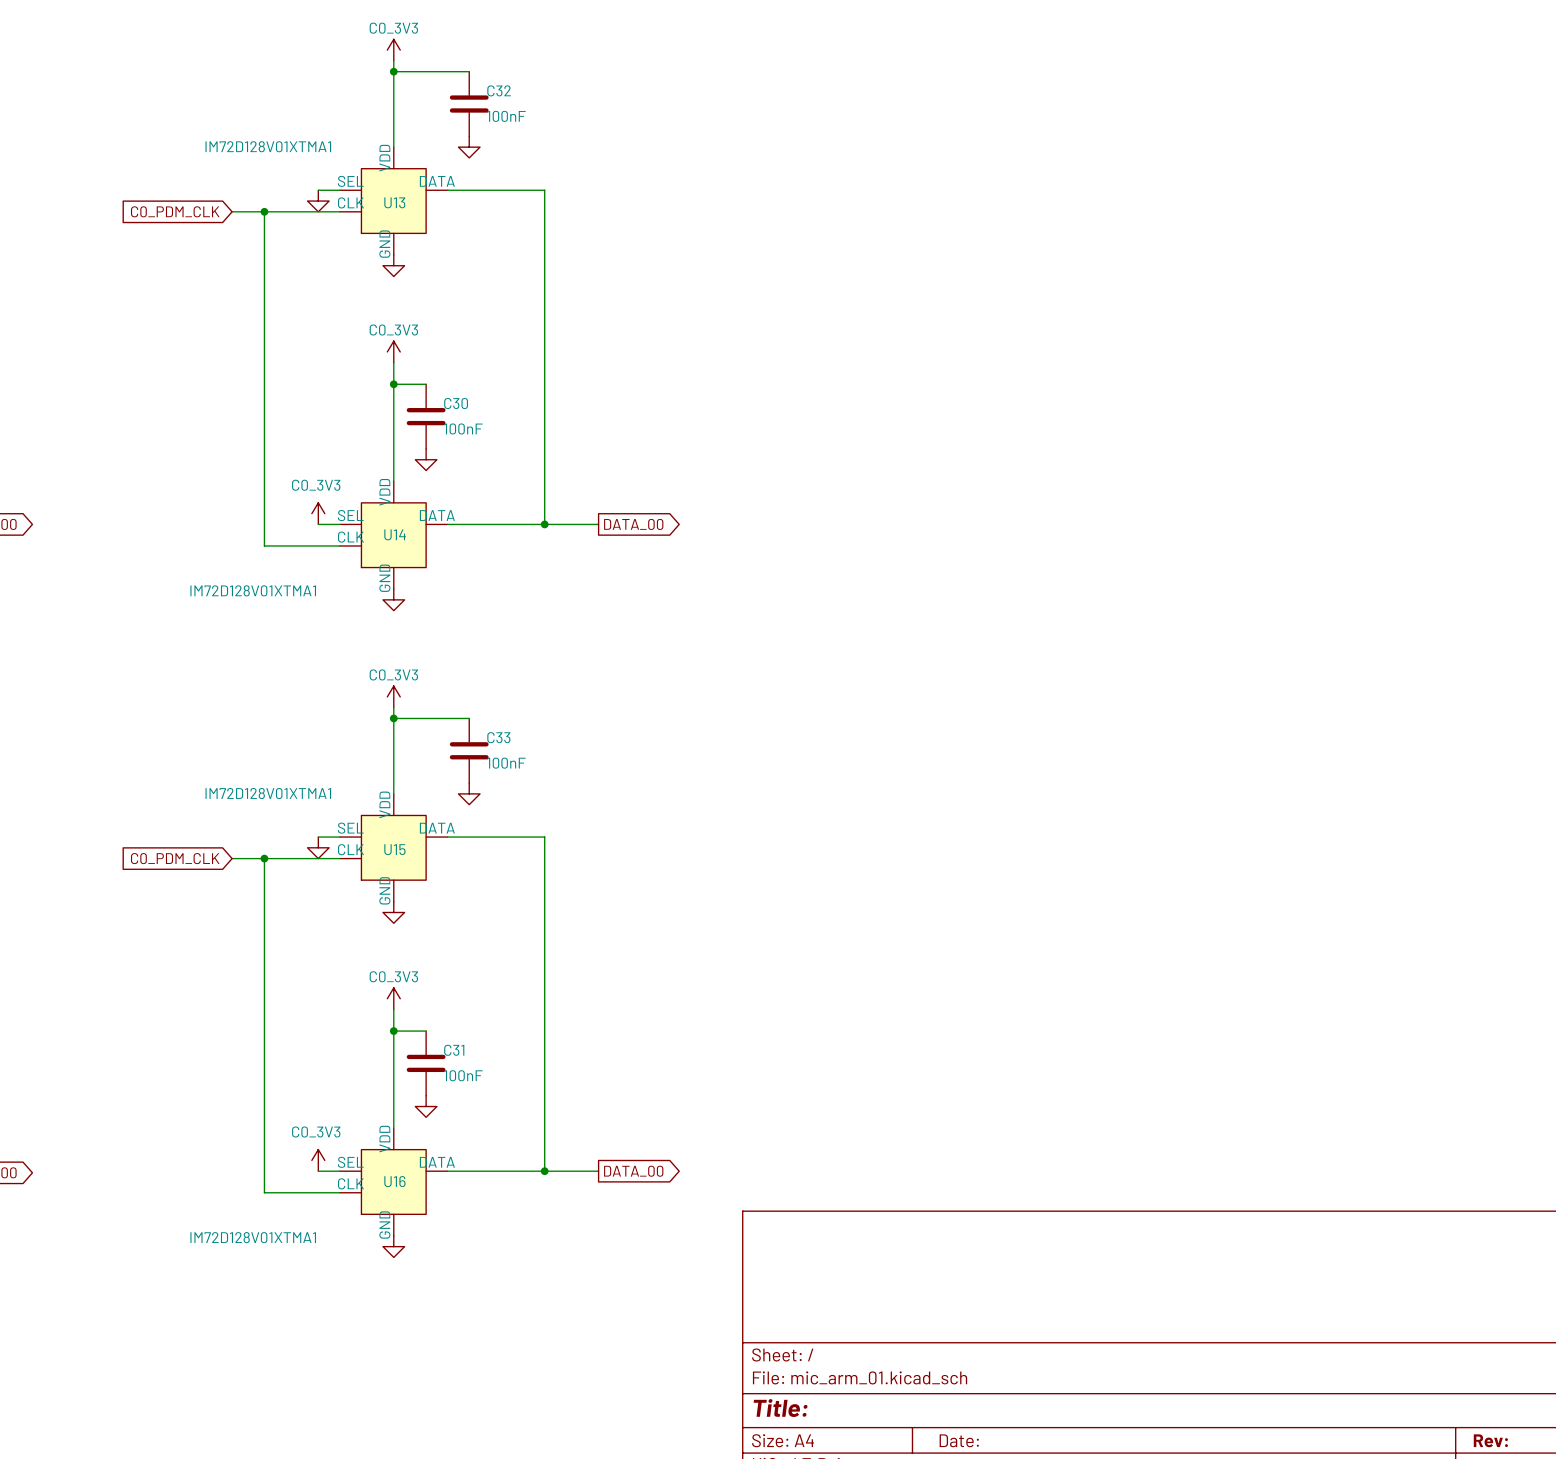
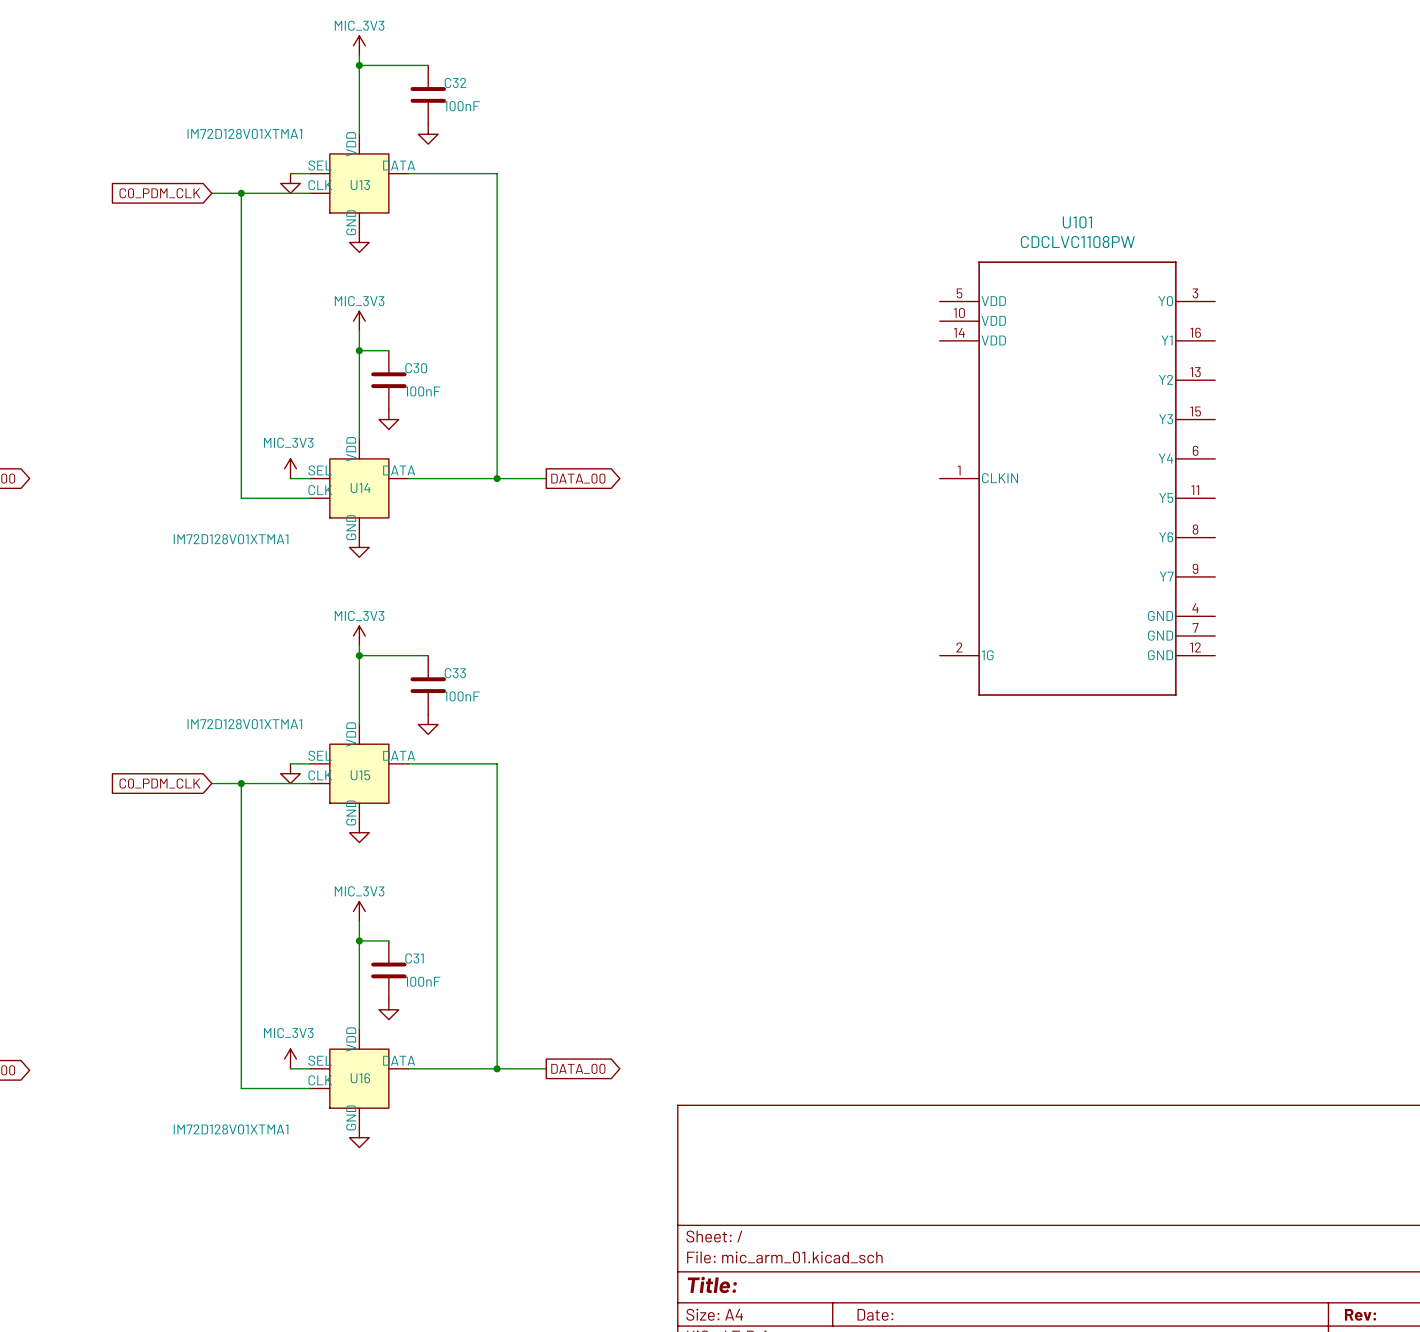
power symbol: C0_3V3 (393, 50) -> MIC_3V3 (359, 45)
power symbol: C0_3V3 (393, 351) -> MIC_3V3 (359, 321)
power symbol: C0_3V3 (318, 513) -> MIC_3V3 (290, 468)
U101: none -> CDCLVC1108PW (1077, 478)
power symbol: C0_3V3 (393, 696) -> MIC_3V3 (359, 635)
power symbol: C0_3V3 (393, 998) -> MIC_3V3 (359, 911)
power symbol: C0_3V3 (318, 1160) -> MIC_3V3 (290, 1058)

